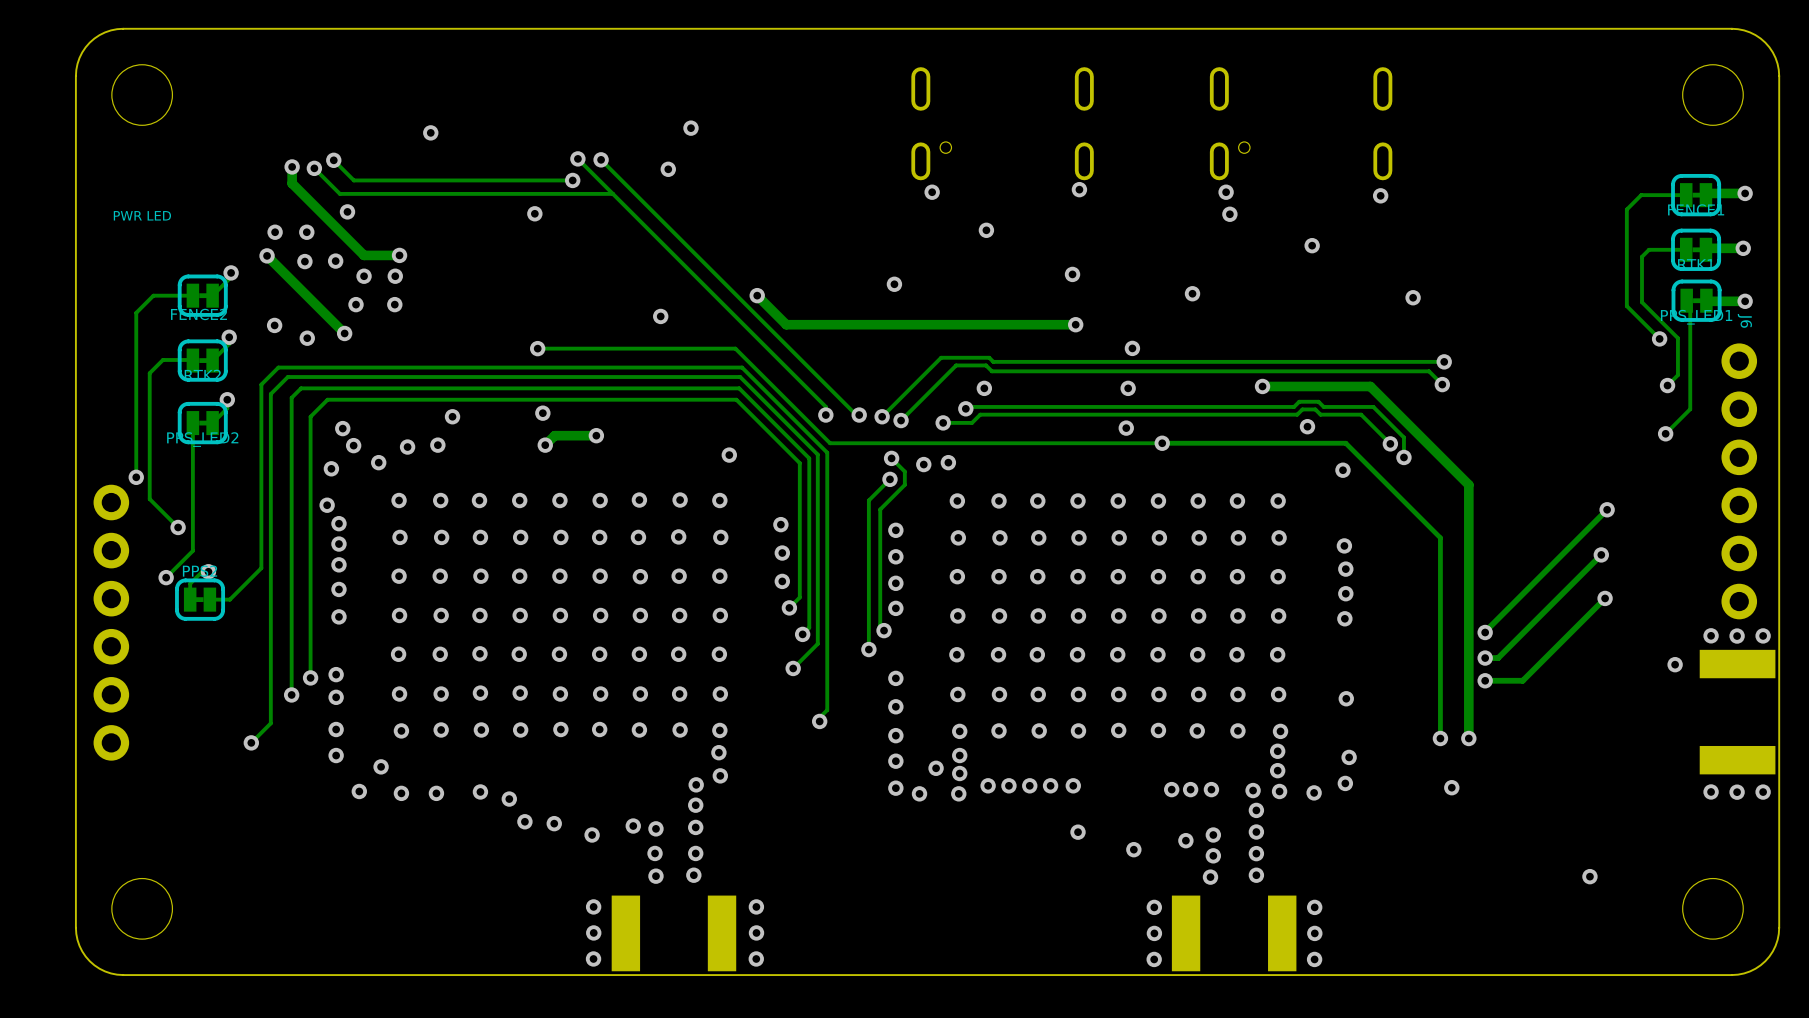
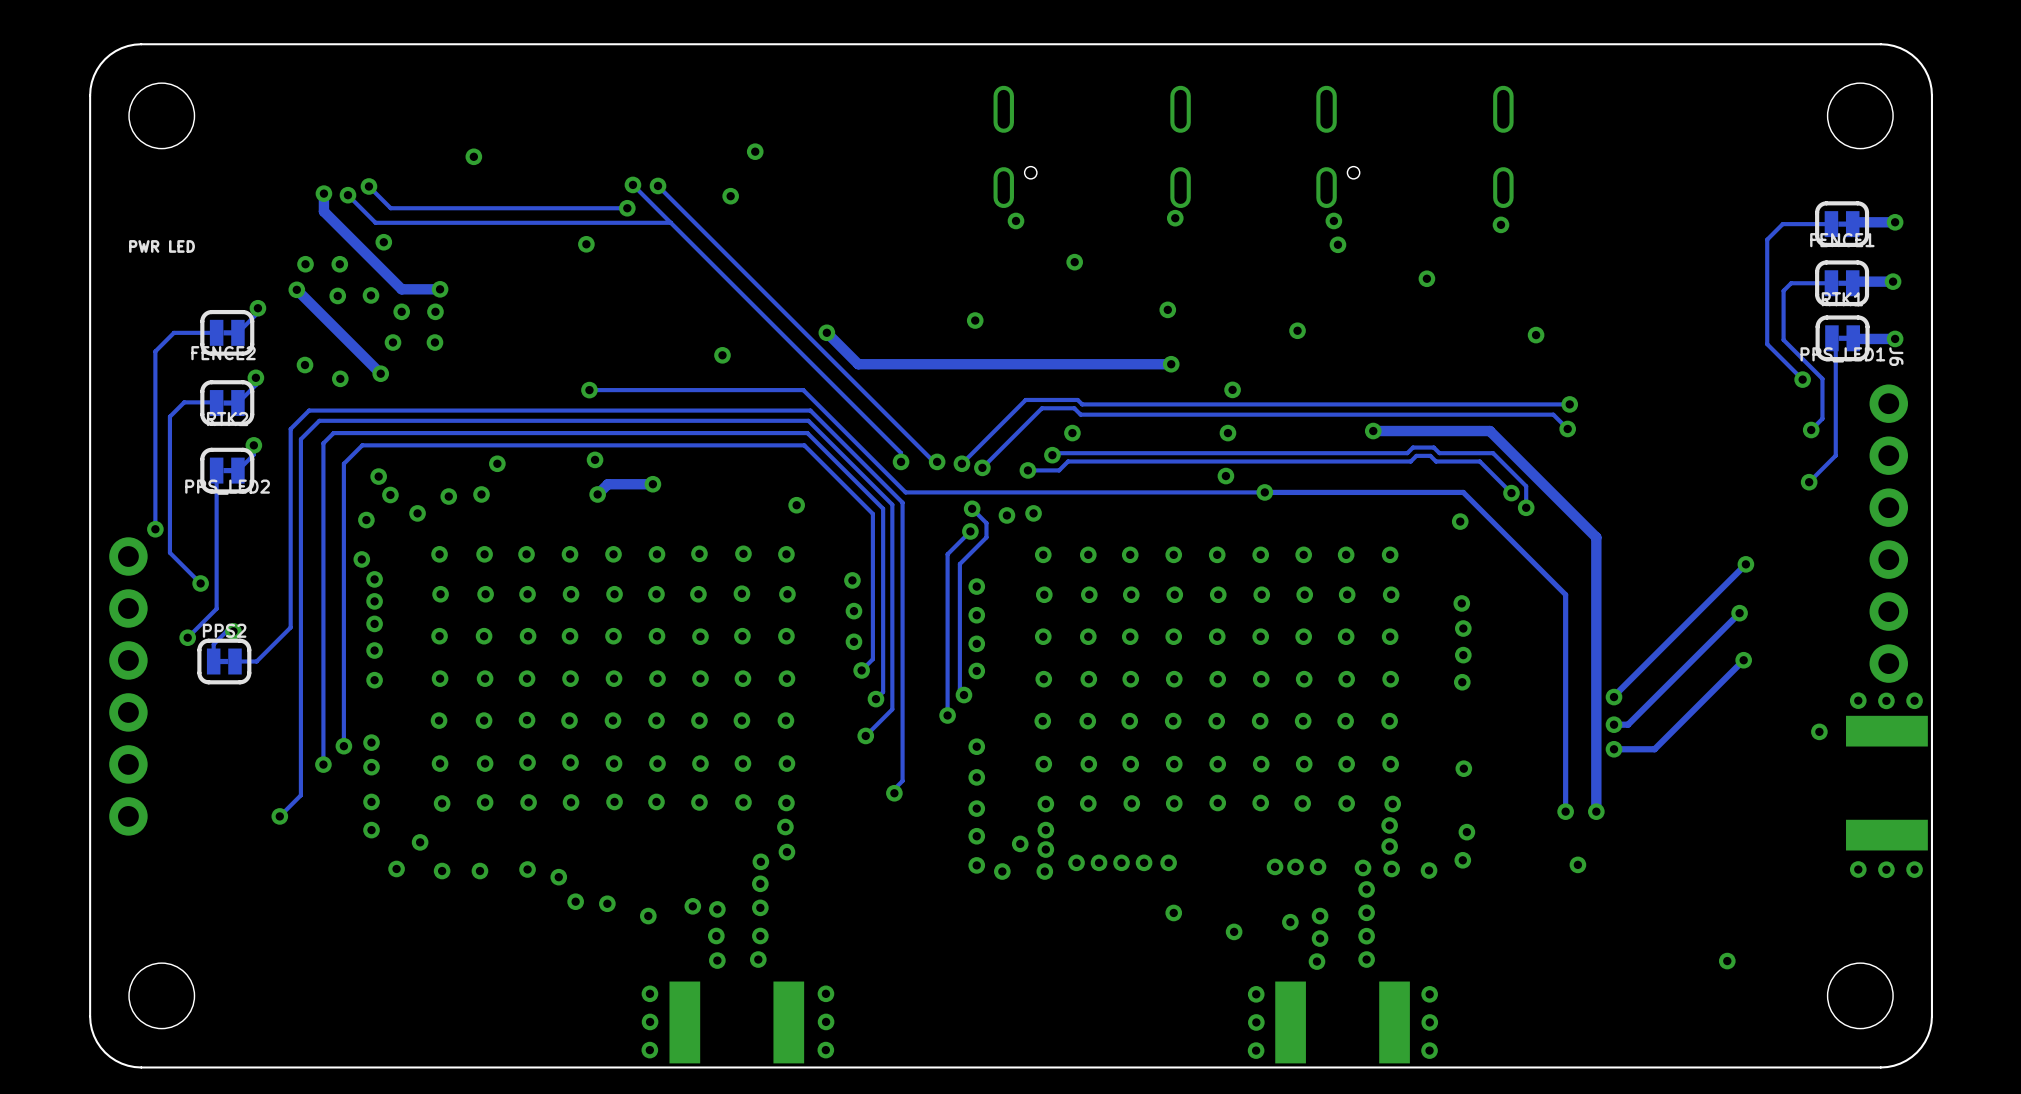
via: (1307, 426) -> none

